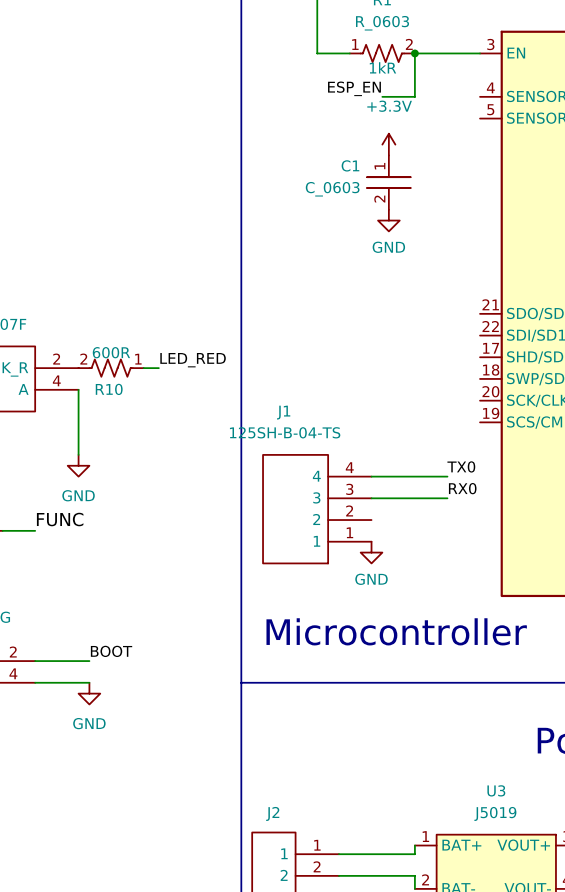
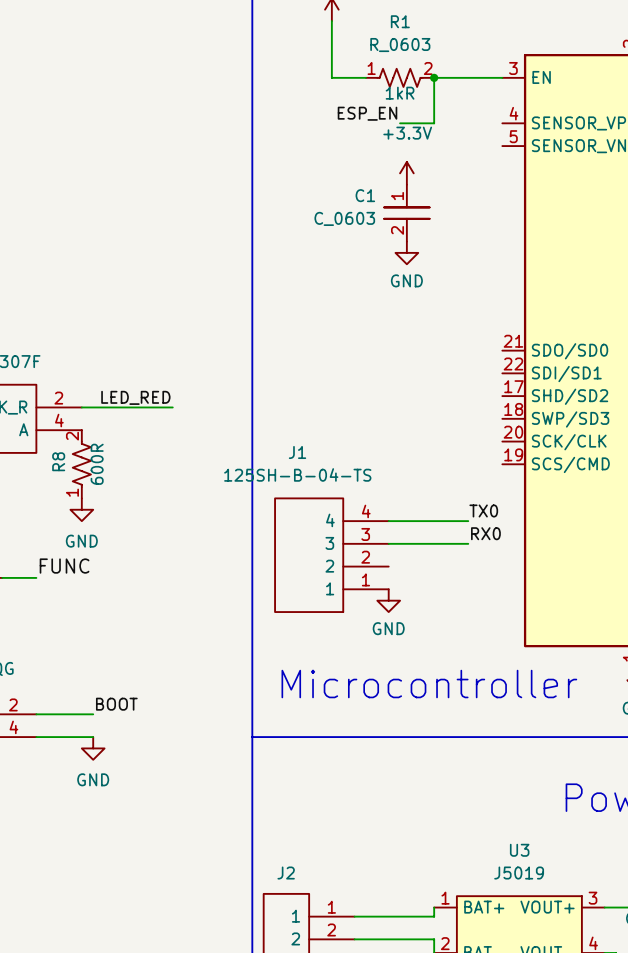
label position: LED_RED (193, 360) -> LED_RED (135, 397)
R10: (111, 368) -> none
wire: none -> (165, 407) (172, 407)
R8: none -> (81, 464)

